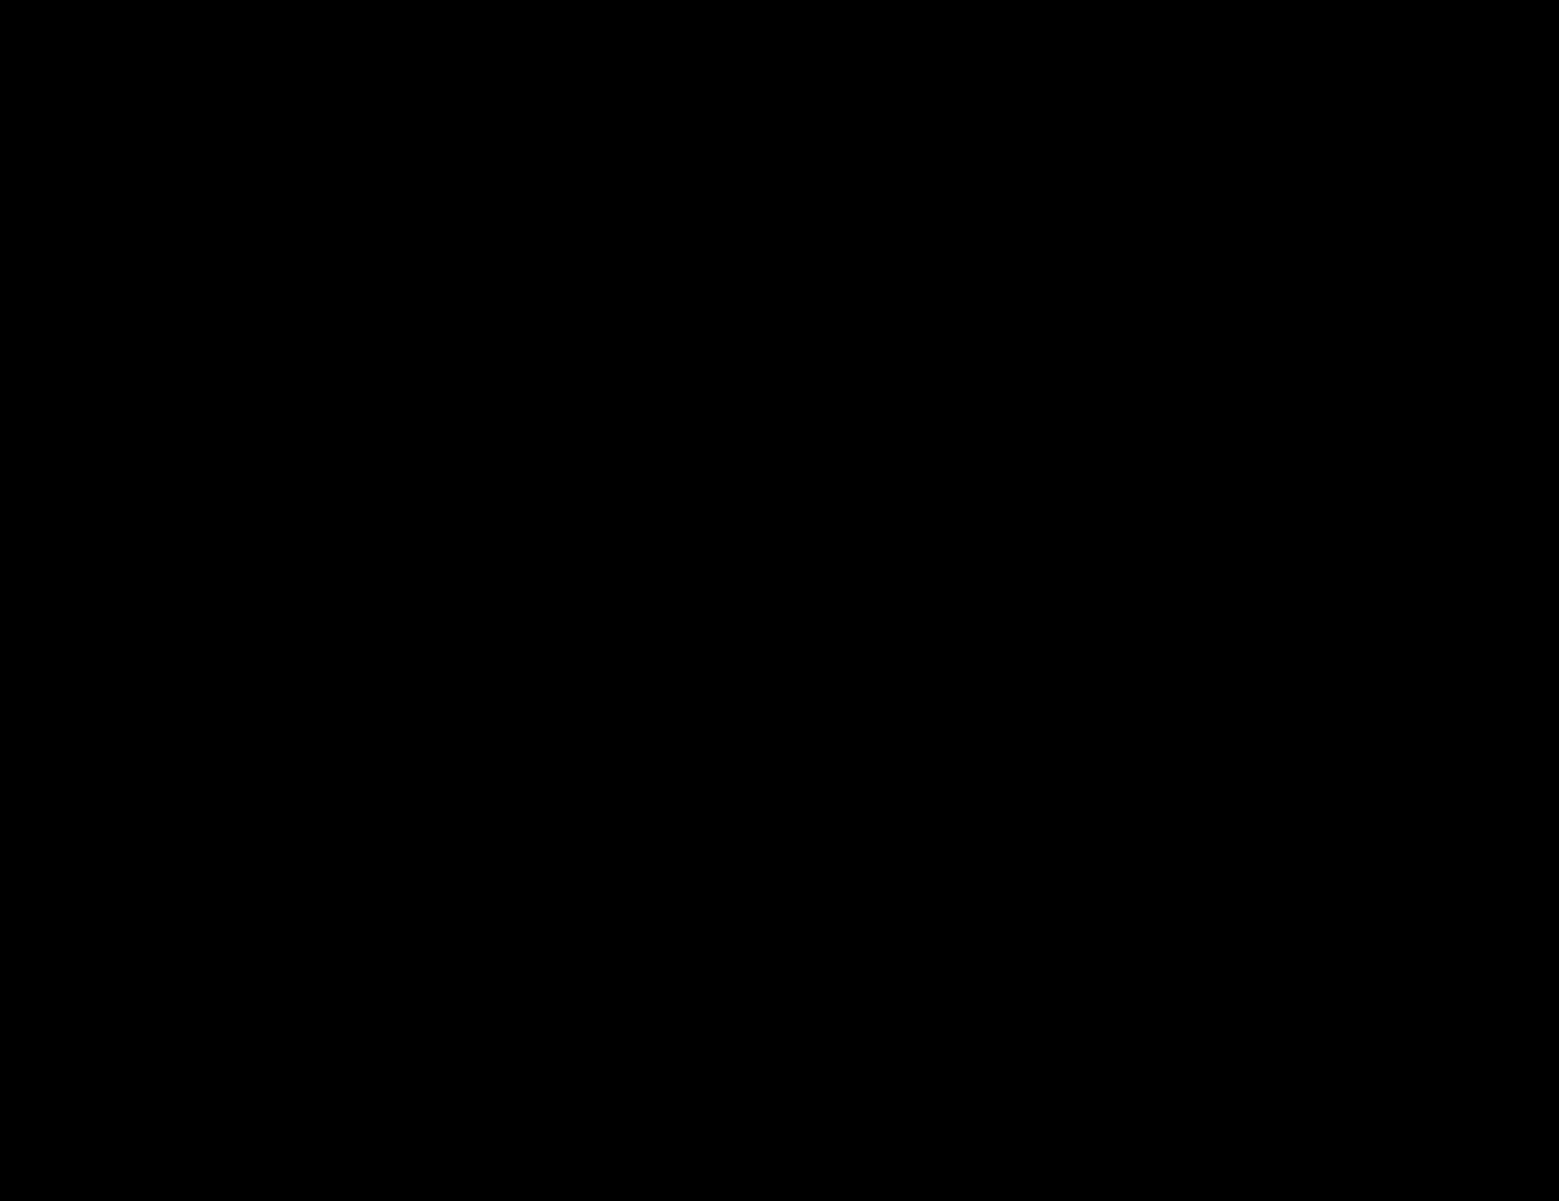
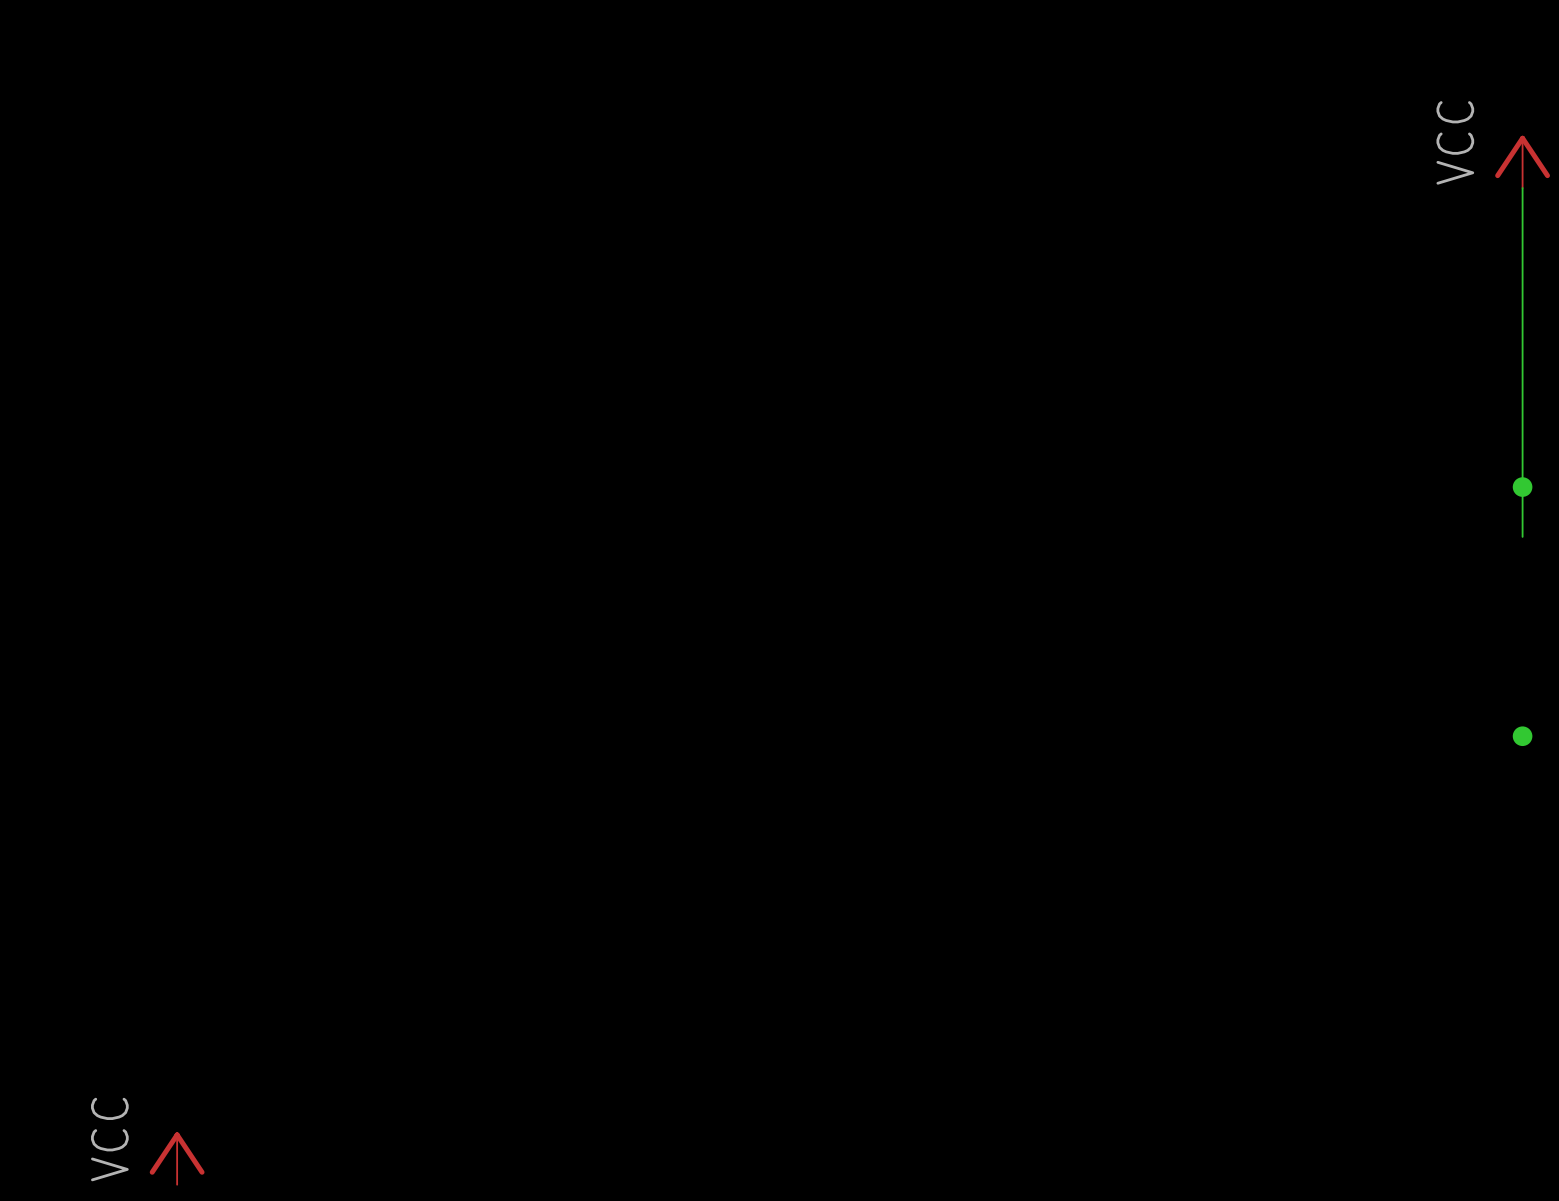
power symbol: none -> VCC (1522, 161)
wire: none -> (1522, 188) (1522, 536)
junction: none -> (1522, 487)
junction: none -> (1522, 736)
power symbol: none -> VCC (177, 1158)

